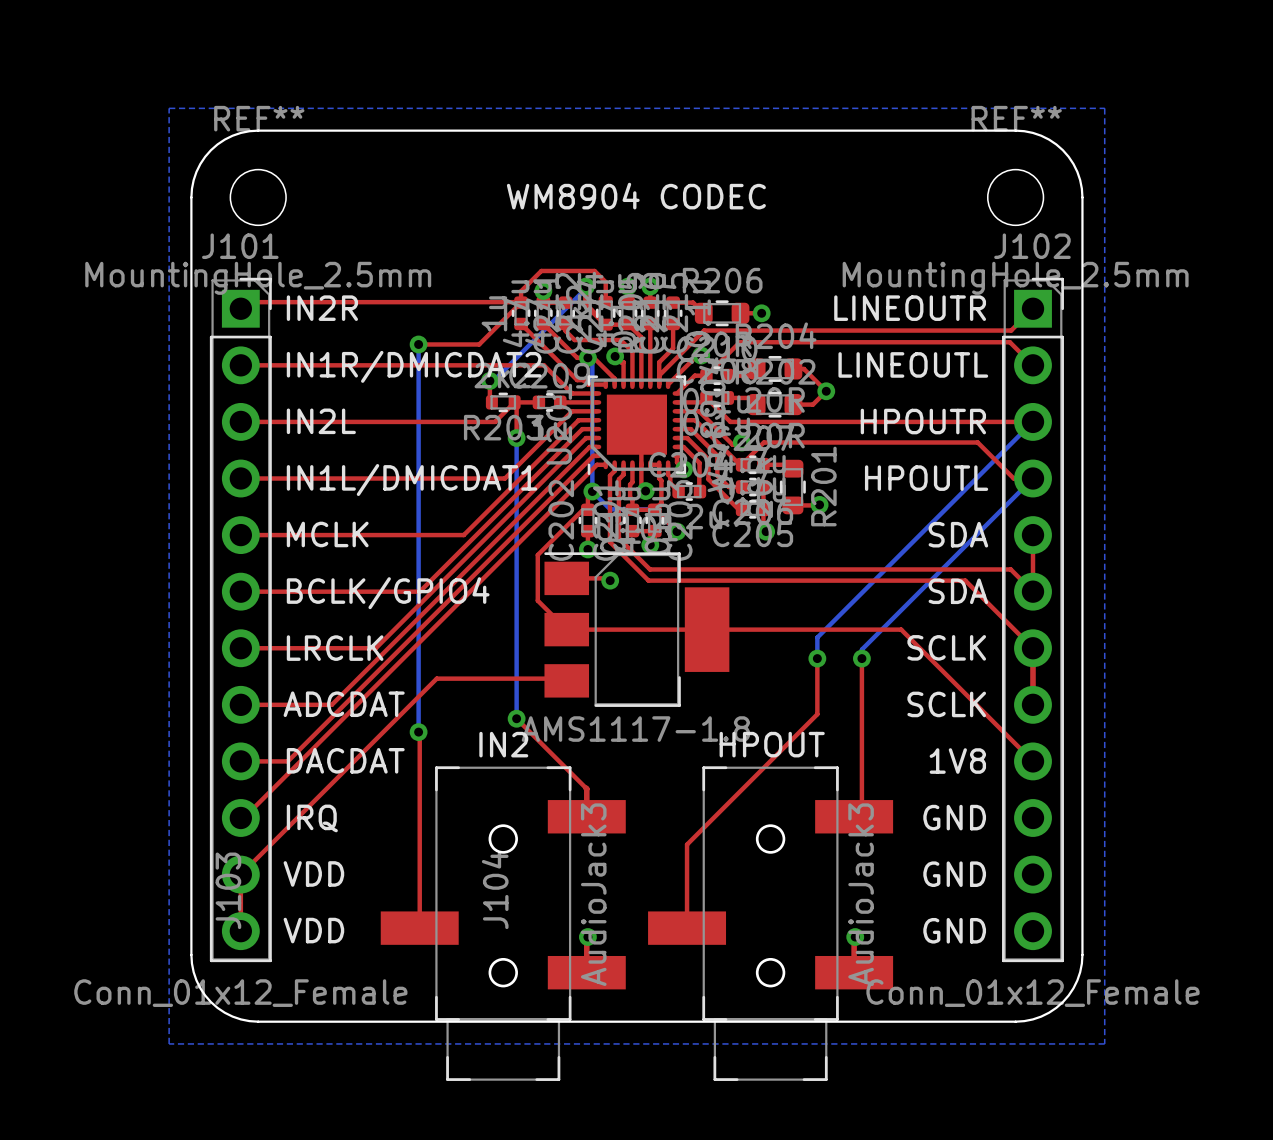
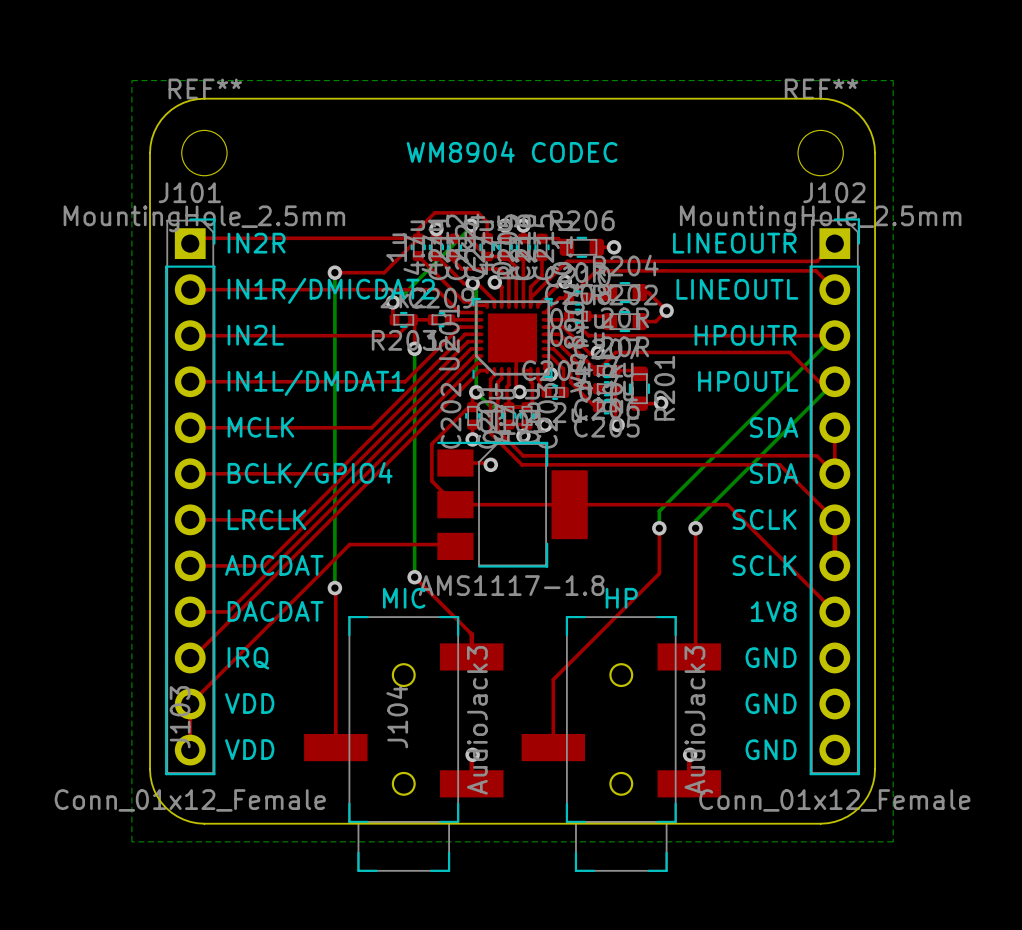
text: IN1L/DMICDAT1 (412, 480) -> IN1L/DMDAT1 (316, 382)
text: IN2 (503, 744) -> MIC (404, 598)
text: HPOUT (772, 744) -> HP (621, 598)

